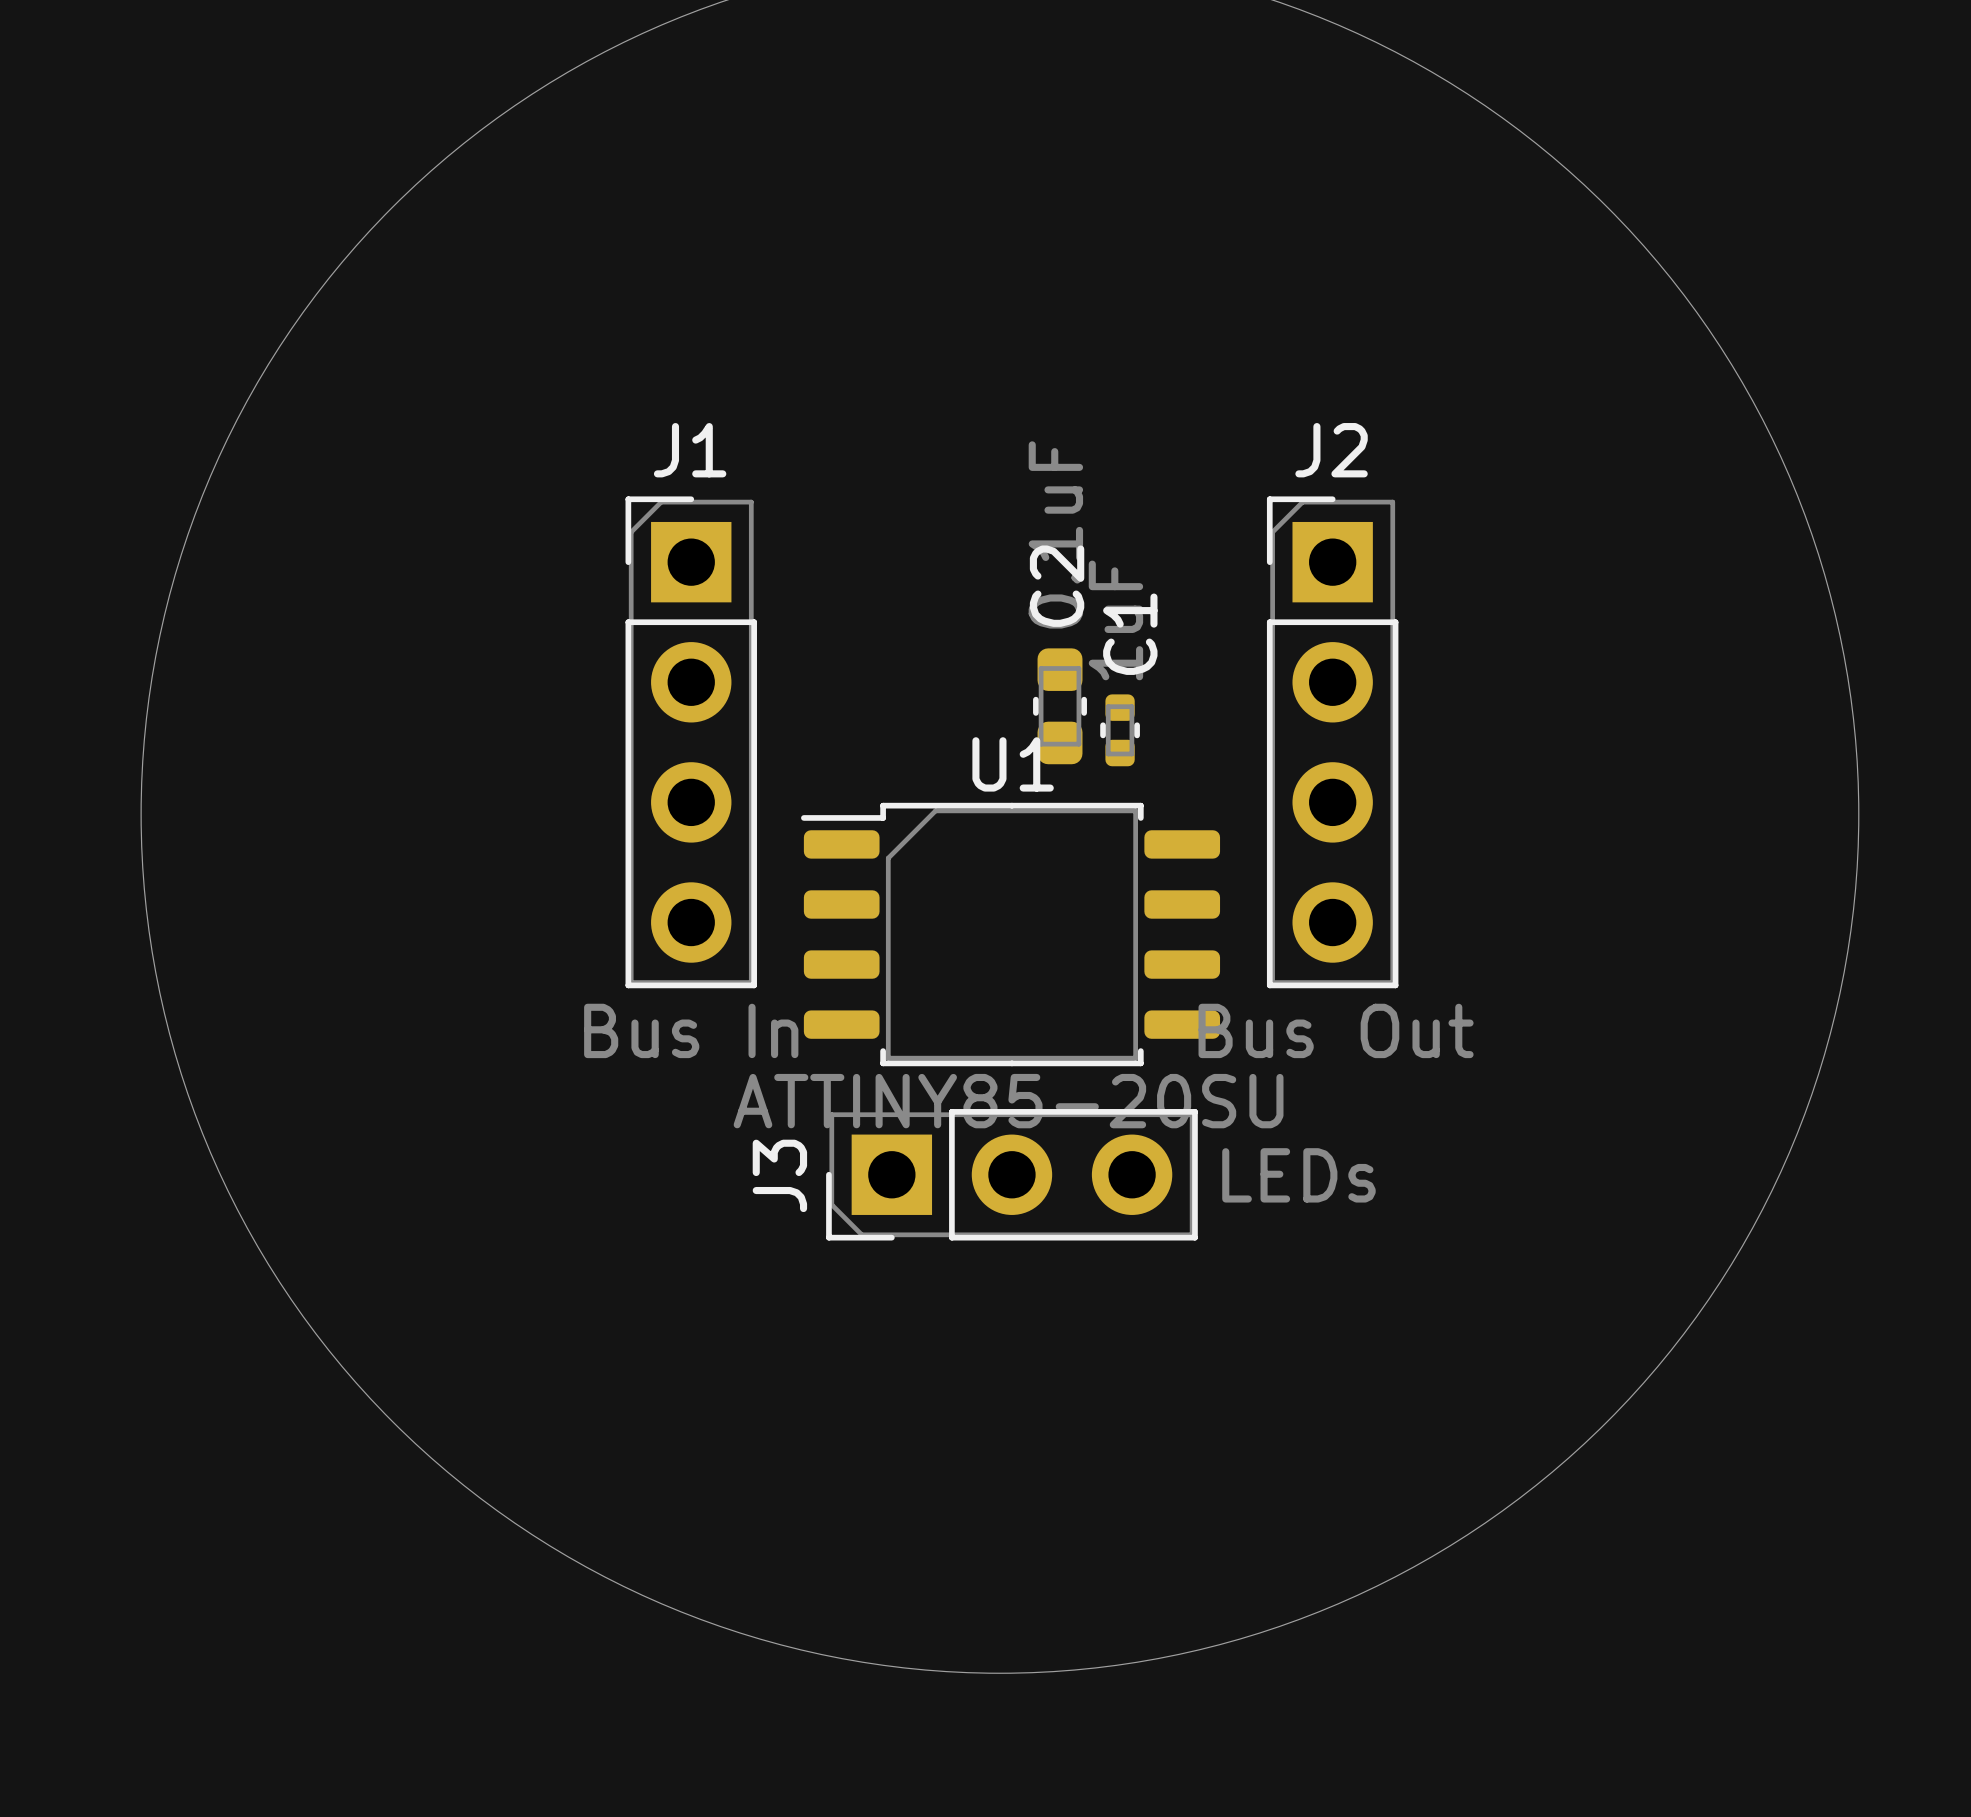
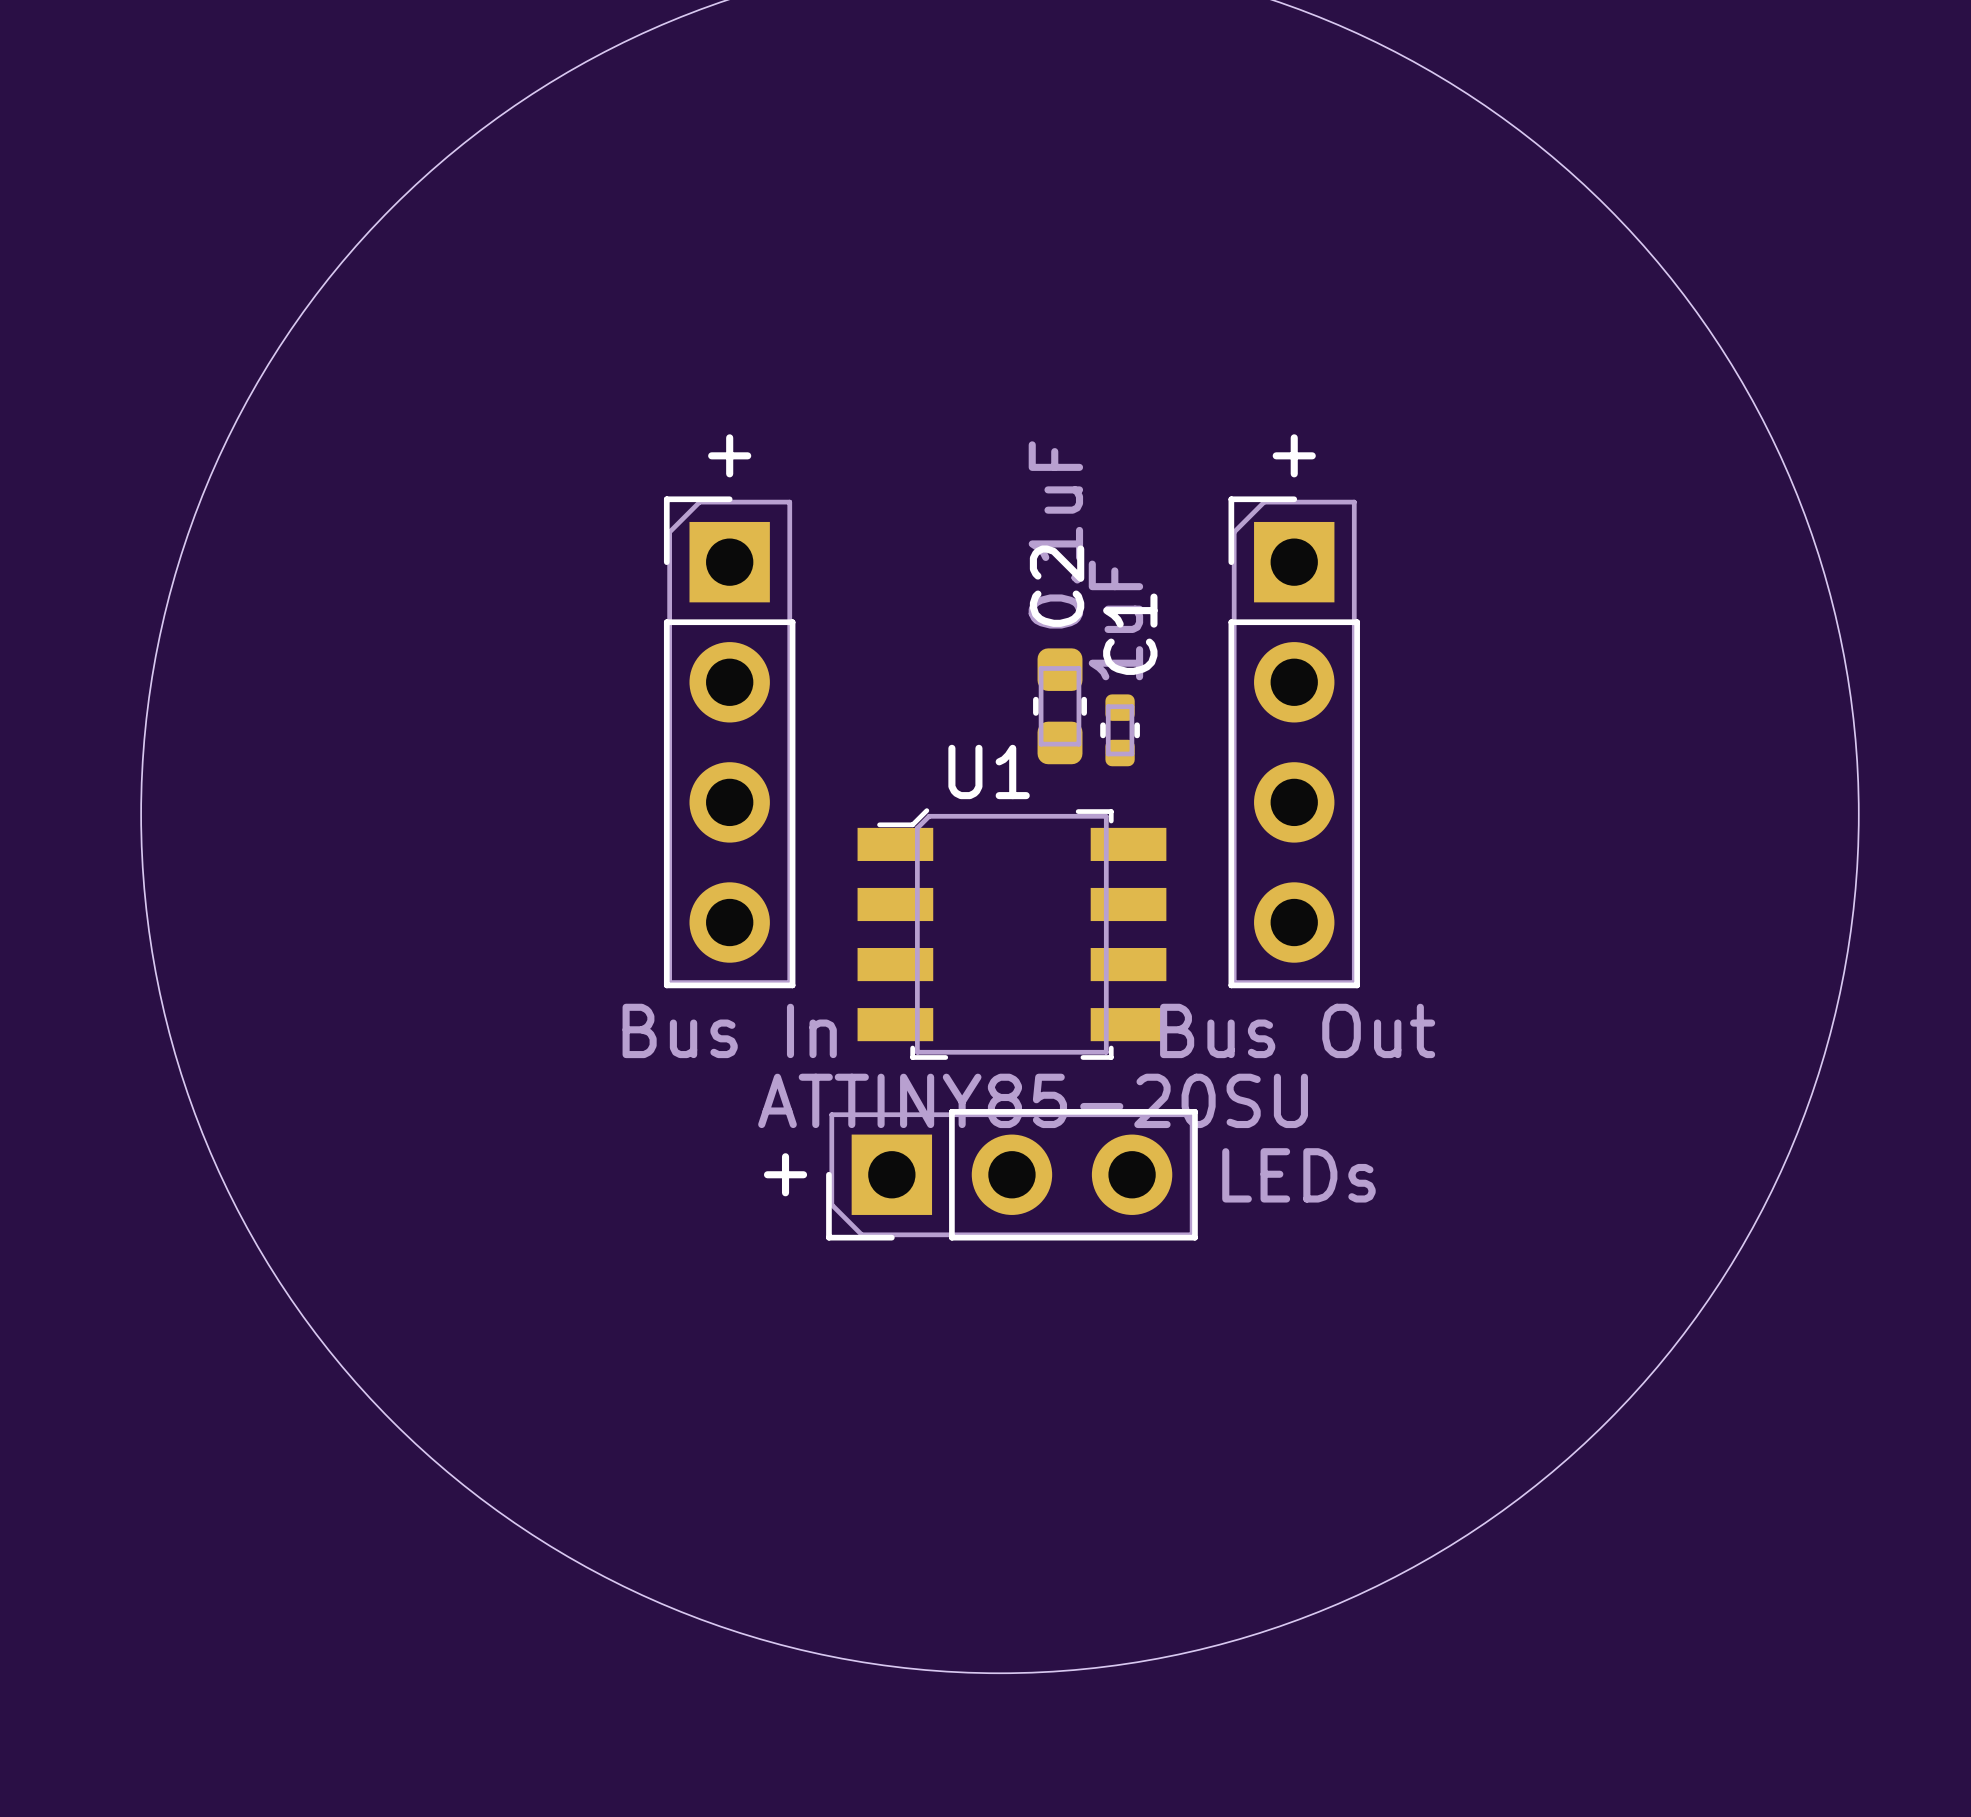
J1 name: J1 (690, 450) -> + (729, 455)
J2 name: J2 (1331, 450) -> + (1294, 455)
J1 position: (691, 742) -> (729, 742)
J2 position: (1332, 742) -> (1294, 742)
U1 footprint: [801, 802, 1221, 1067] -> [857, 808, 1167, 1060]
J3 name: J3 (779, 1175) -> + (785, 1174)

